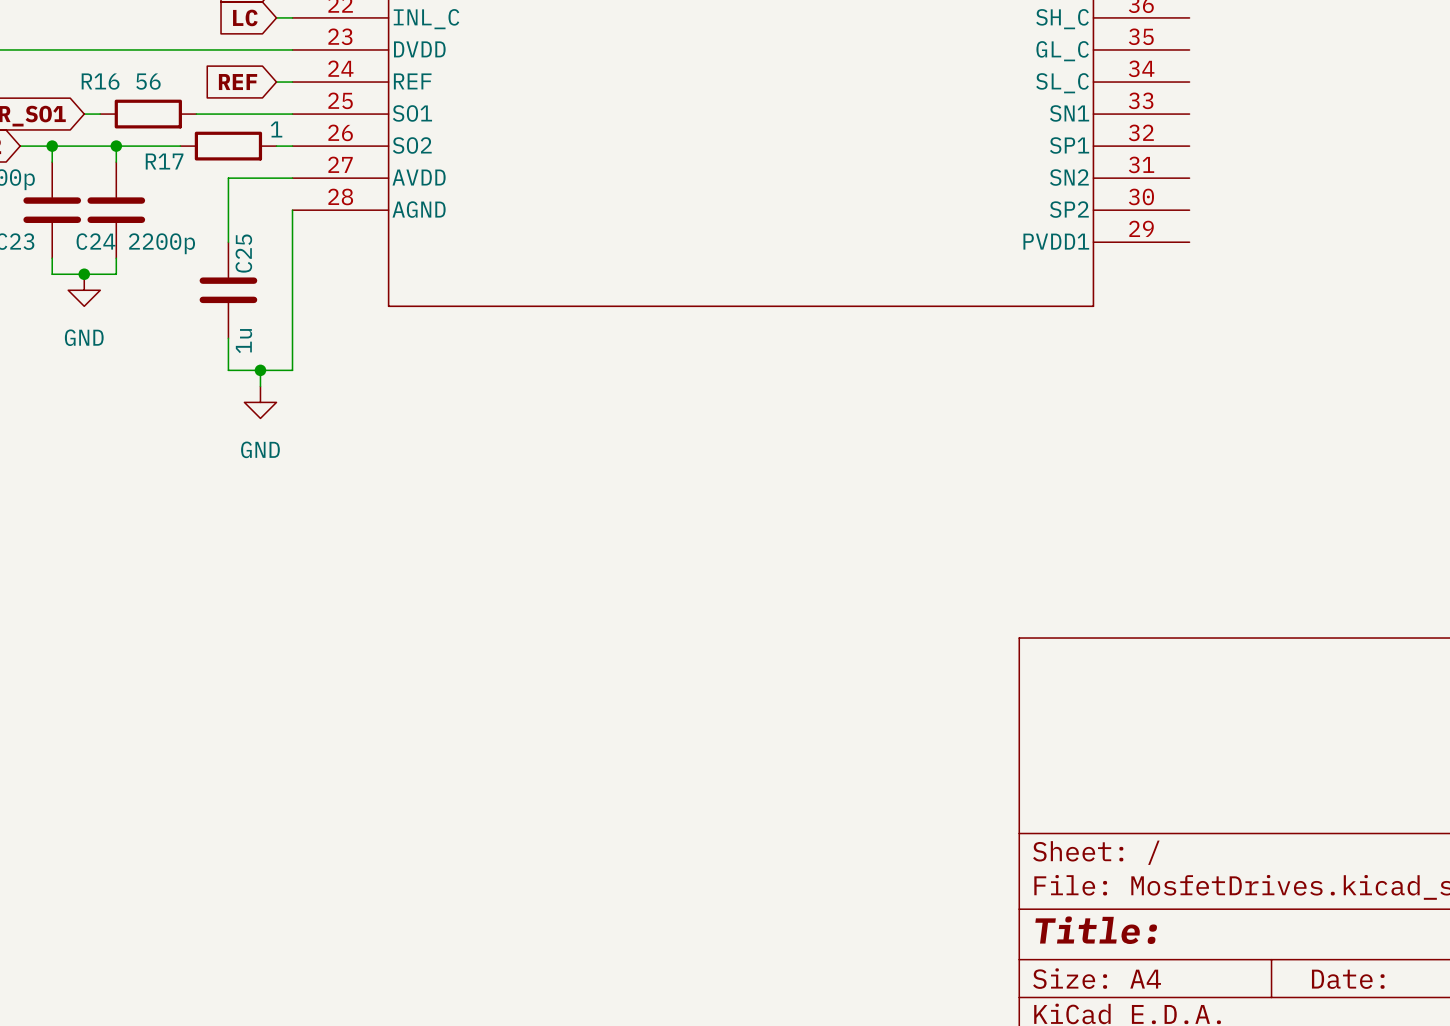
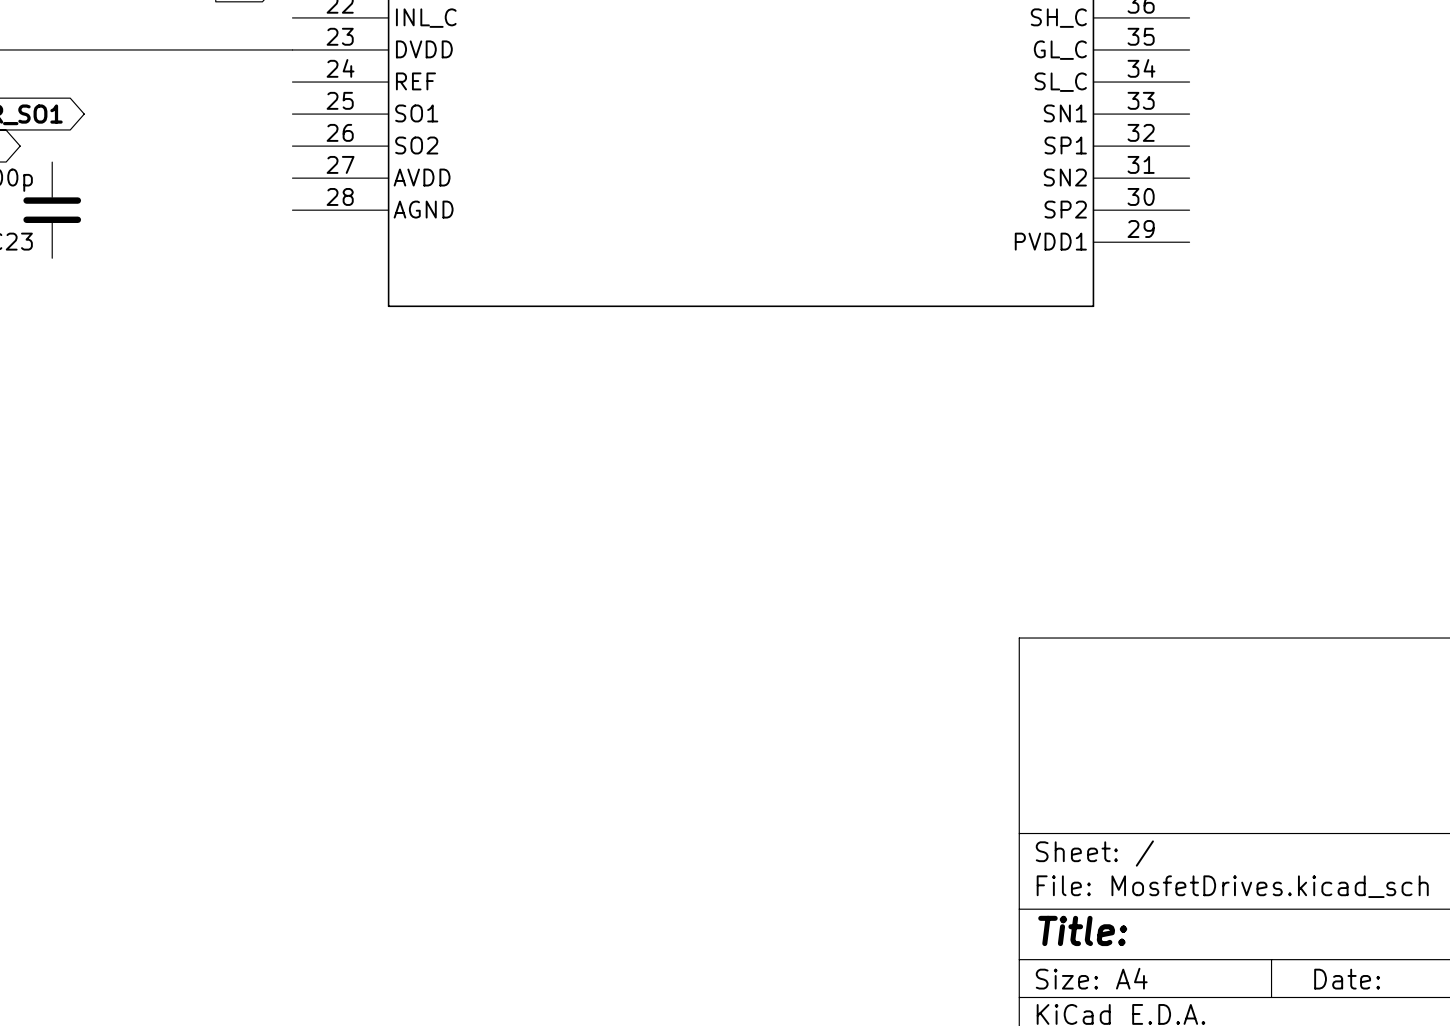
global label: LC (245, 17) -> none
wire: (276, 17) (292, 17) -> none
global label: REF (238, 82) -> none
wire: (276, 82) (292, 82) -> none
wire: (84, 114) (100, 114) -> none
R16: 56 (148, 114) -> none
wire: (196, 114) (292, 114) -> none
wire: (20, 146) (180, 146) -> none
wire: (52, 146) (52, 162) -> none
junction: (52, 146) -> none
wire: (116, 146) (116, 162) -> none
junction: (116, 146) -> none
R17: 1 (228, 146) -> none
wire: (276, 146) (292, 146) -> none
wire: (292, 178) (228, 178) (228, 242) -> none
C24: 2200p (116, 210) -> none
wire: (292, 210) (292, 370) (228, 370) (228, 338) -> none
wire: (52, 258) (52, 274) (116, 274) (116, 258) -> none
junction: (84, 274) -> none
power symbol: GND (84, 290) -> none
C25: 1u (228, 290) -> none
wire: (260, 370) (260, 386) -> none
junction: (260, 370) -> none
power symbol: GND (260, 402) -> none

